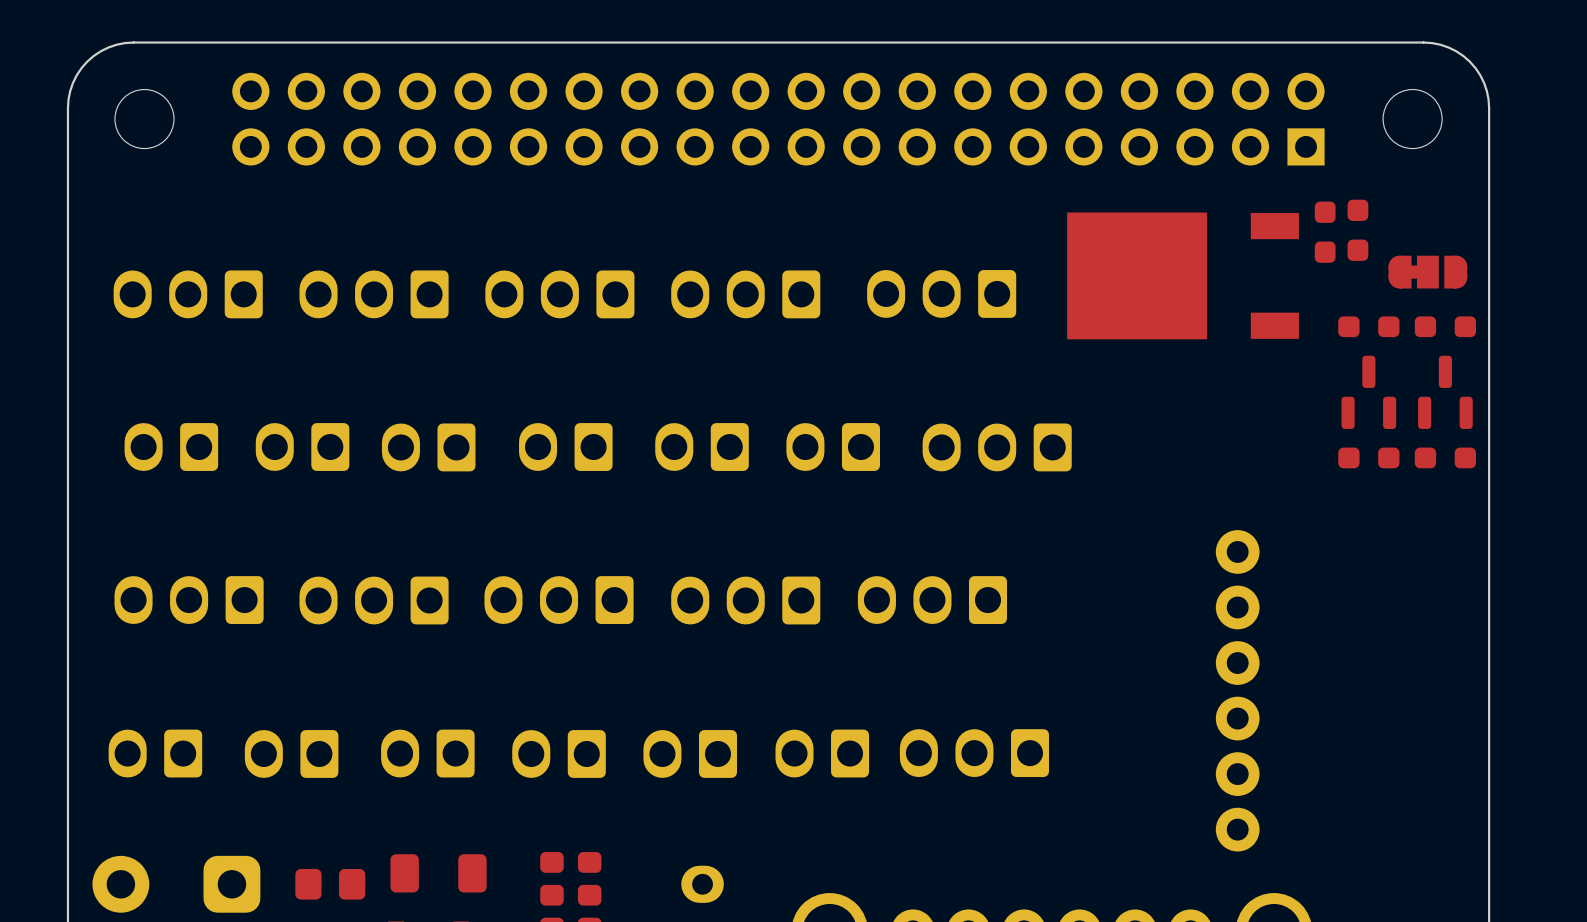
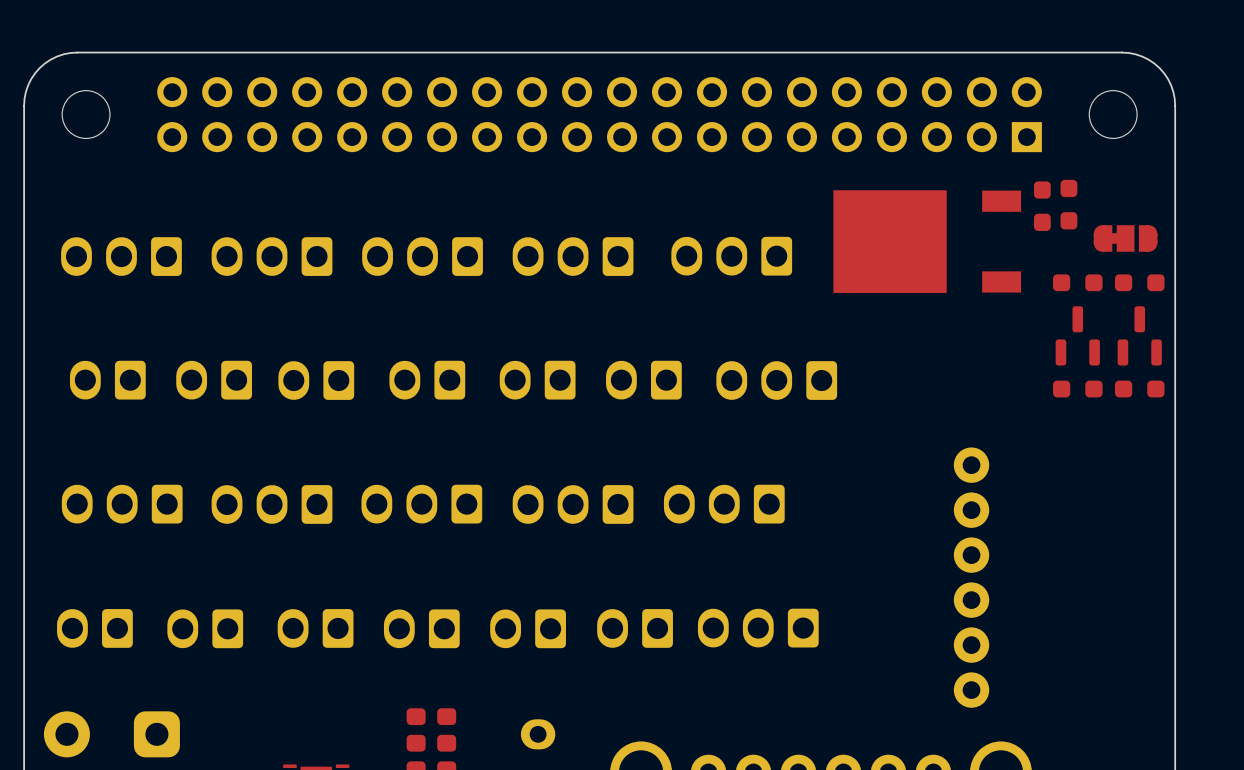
part: (438, 873) -> none
part: (330, 884) -> none

